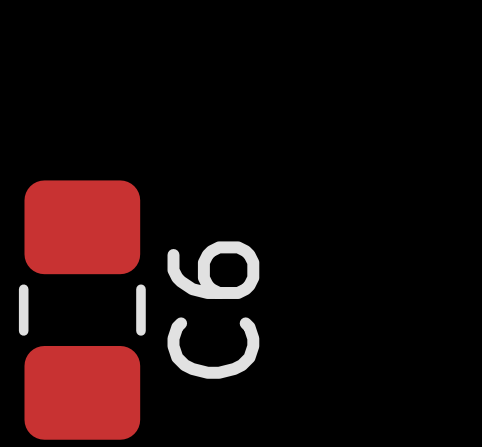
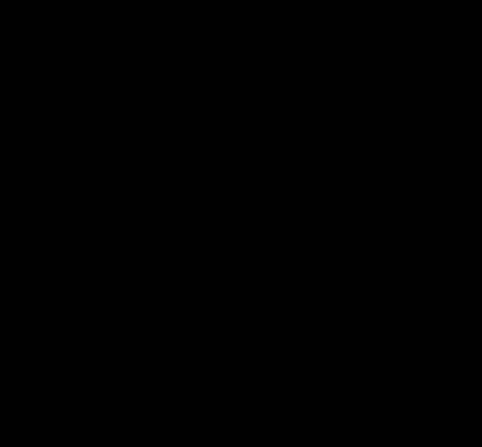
C6: (82, 310) -> none

